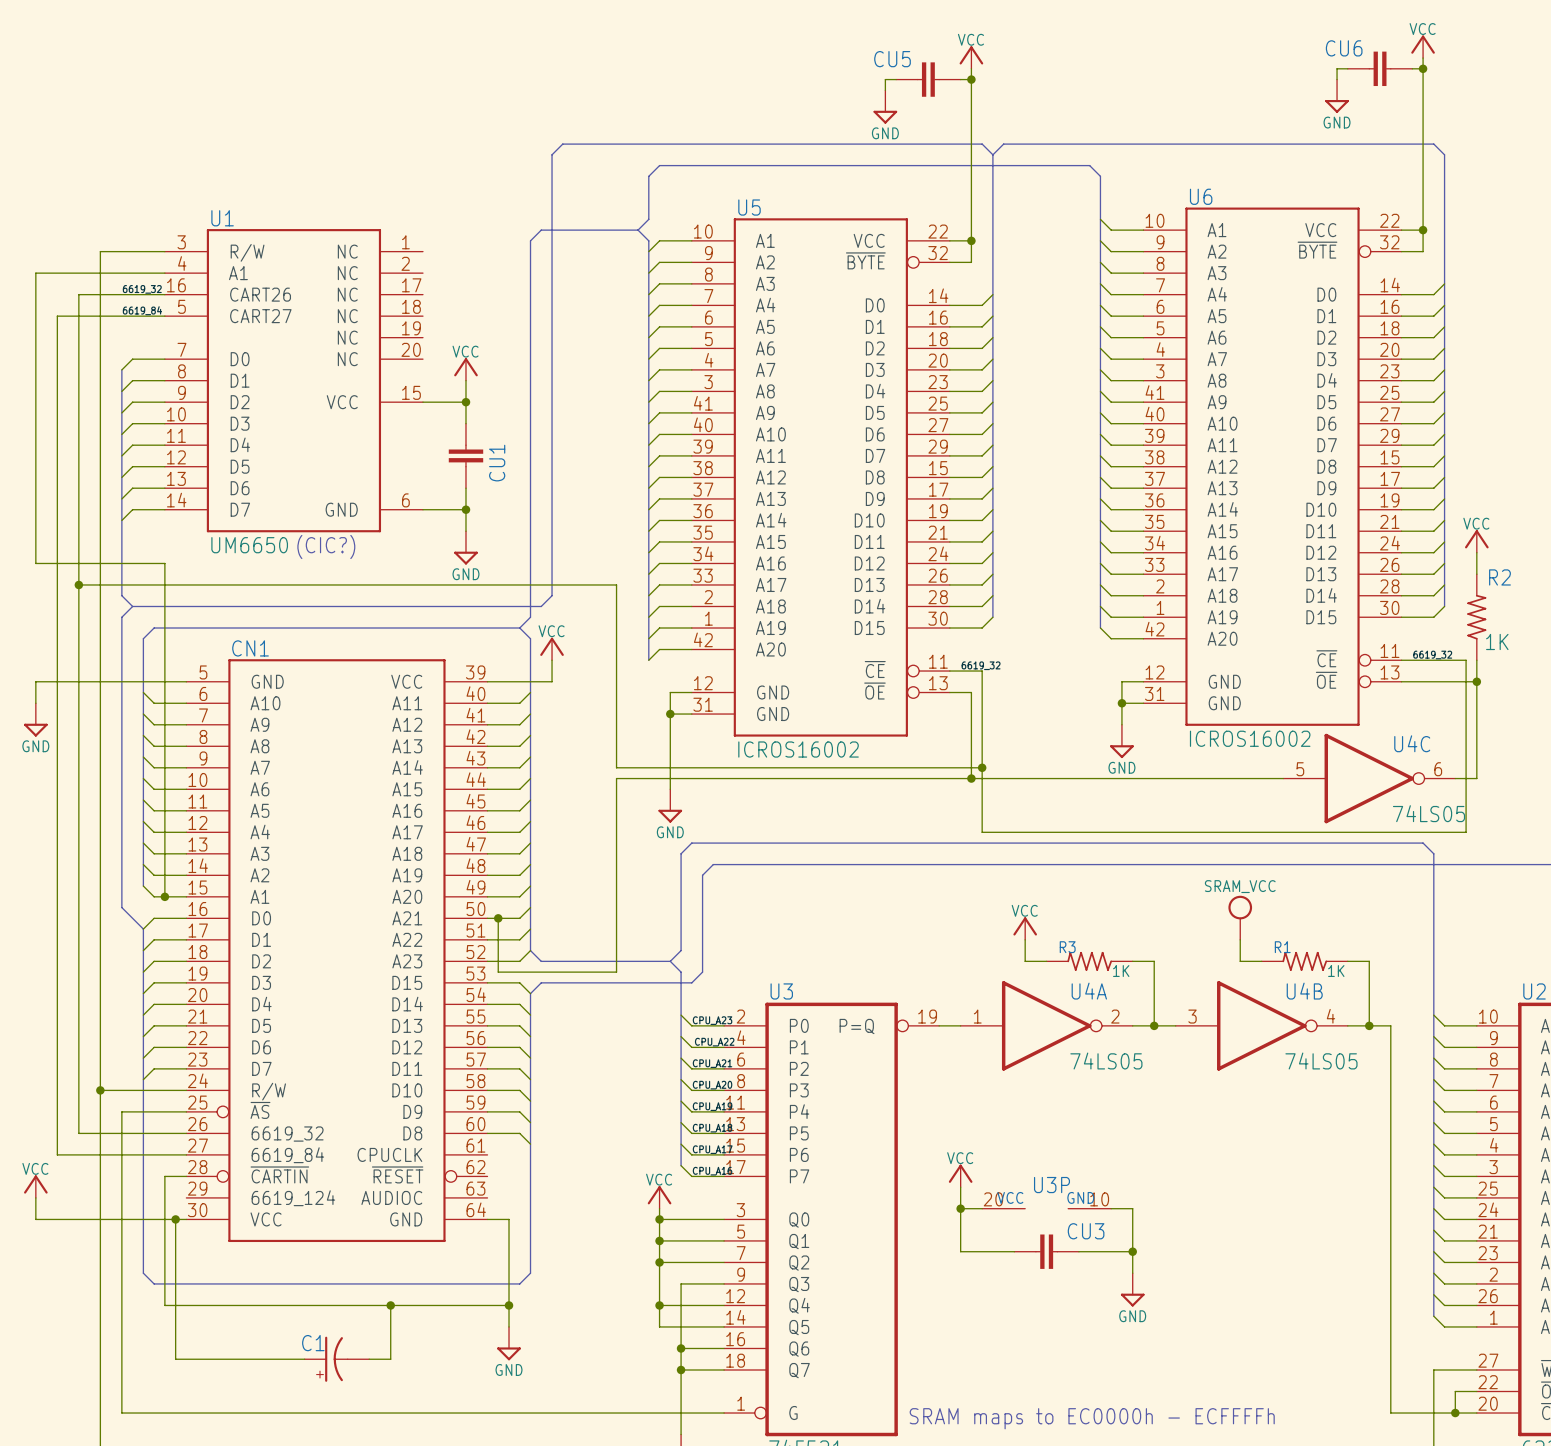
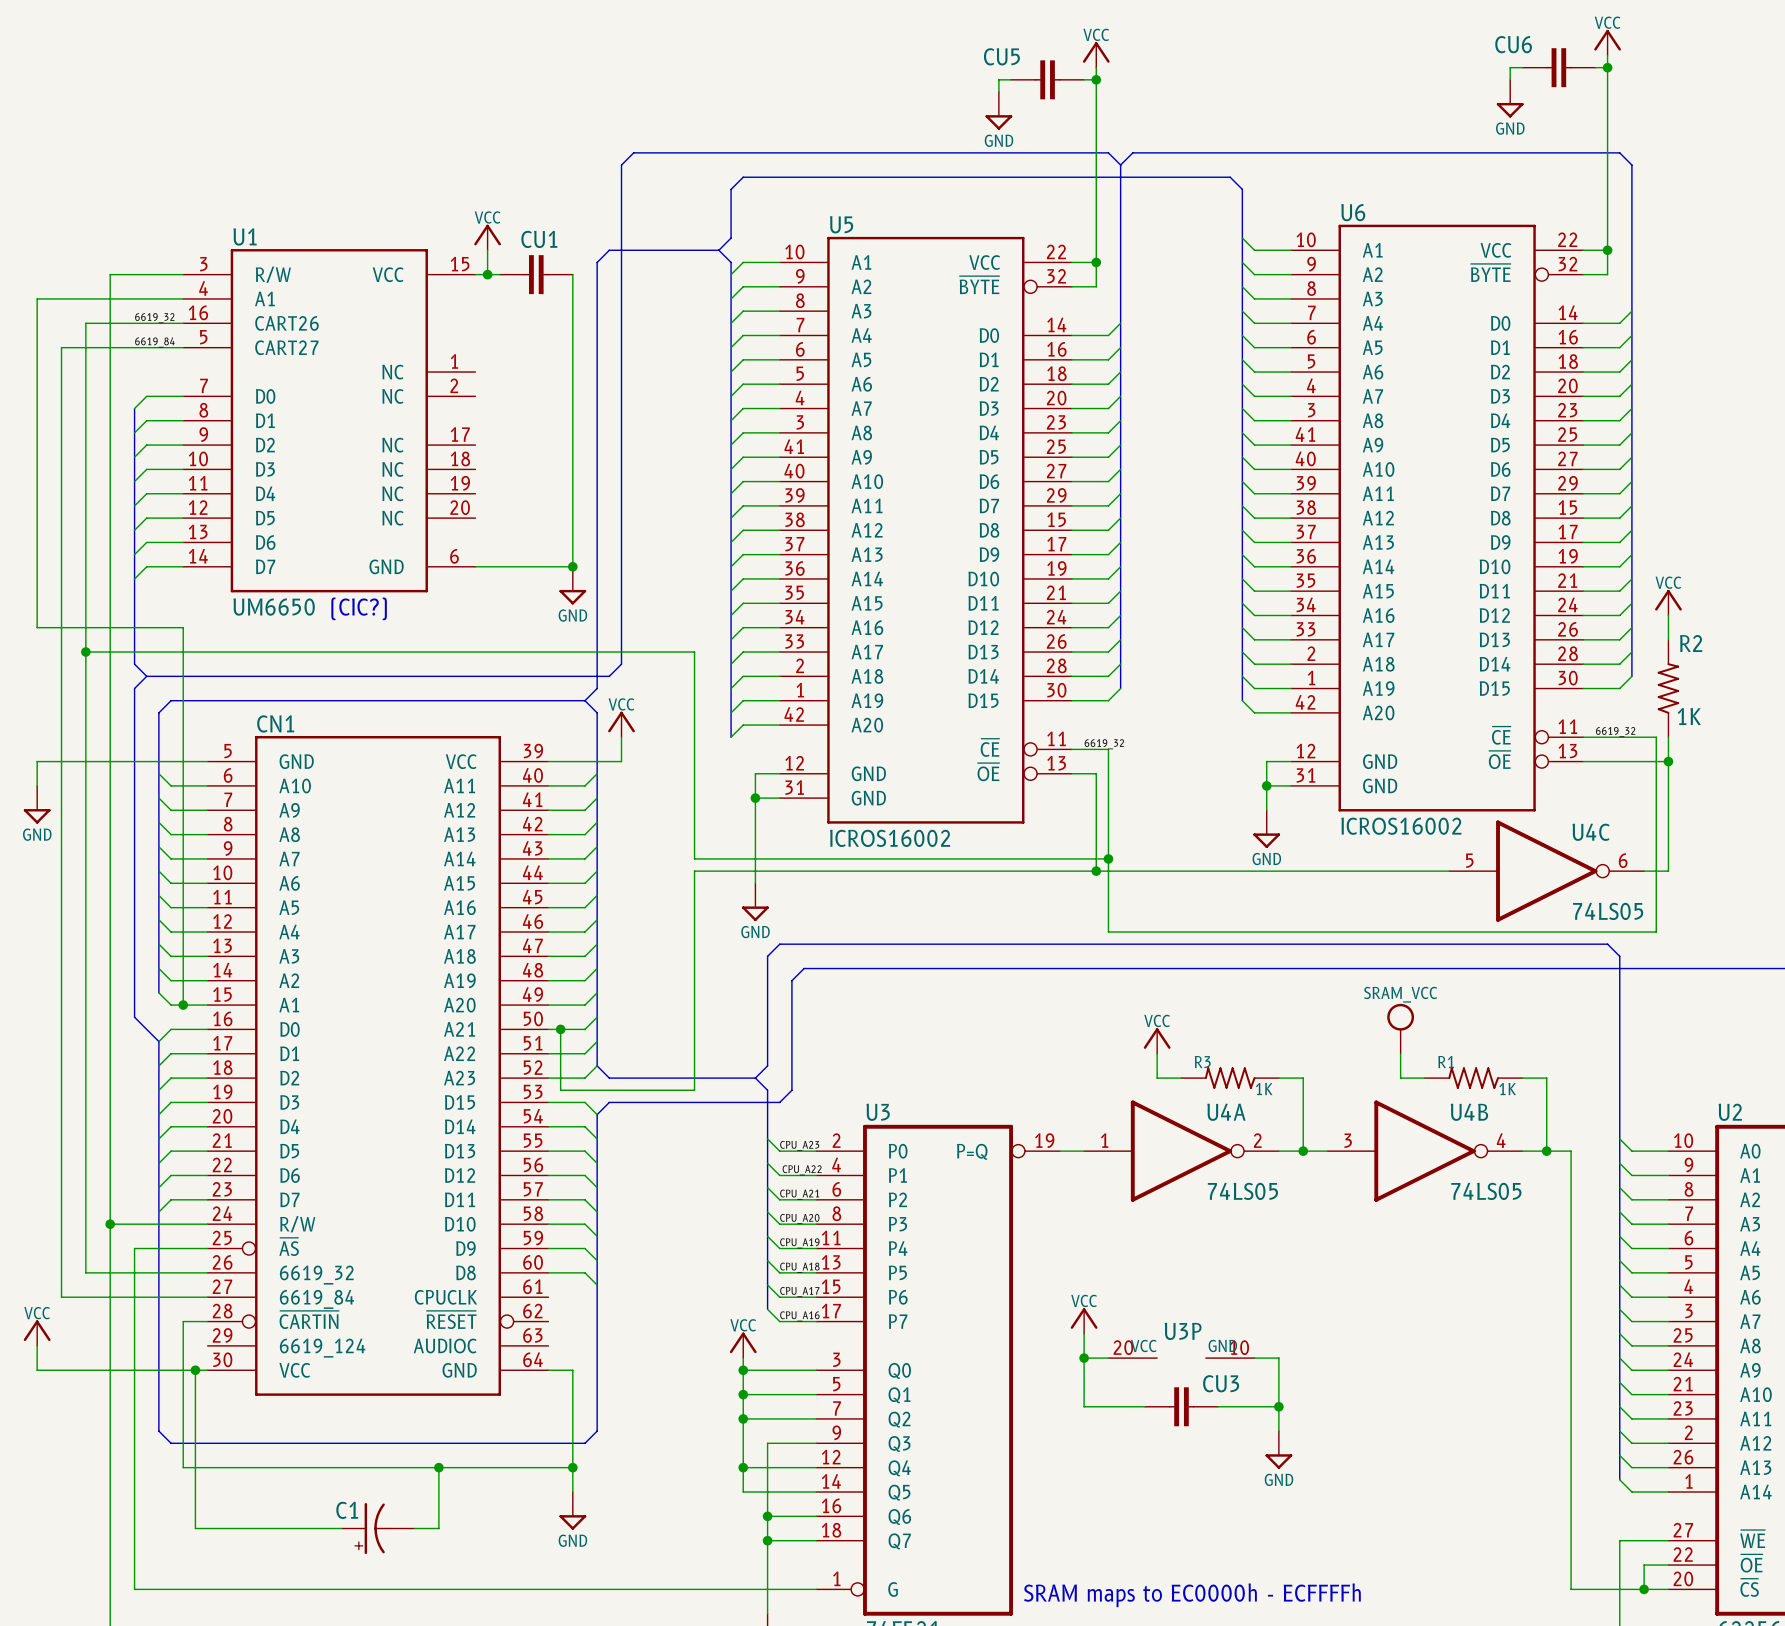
U1 symbol: [164, 229, 423, 533] -> [183, 249, 476, 593]
wire: none -> (487, 250) (487, 274)
wire: none -> (475, 274) (499, 274)
junction: none -> (487, 274)
wire: none -> (572, 274) (572, 566) (524, 566)
power symbol position: VCC (465, 369) -> VCC (487, 237)
wire: (465, 380) (465, 423) -> none
wire: (422, 402) (465, 402) -> none
junction: (465, 402) -> none
CU1 rotation: 0° (465, 455) -> 90° clockwise (536, 274)
CU1 position: (465, 455) -> (536, 274)
CU1 name position: CU1 (497, 463) -> CU1 (539, 239)
wire: (465, 488) (465, 531) -> none
junction position: (465, 509) -> (572, 566)
power symbol position: GND (465, 547) -> GND (572, 585)

